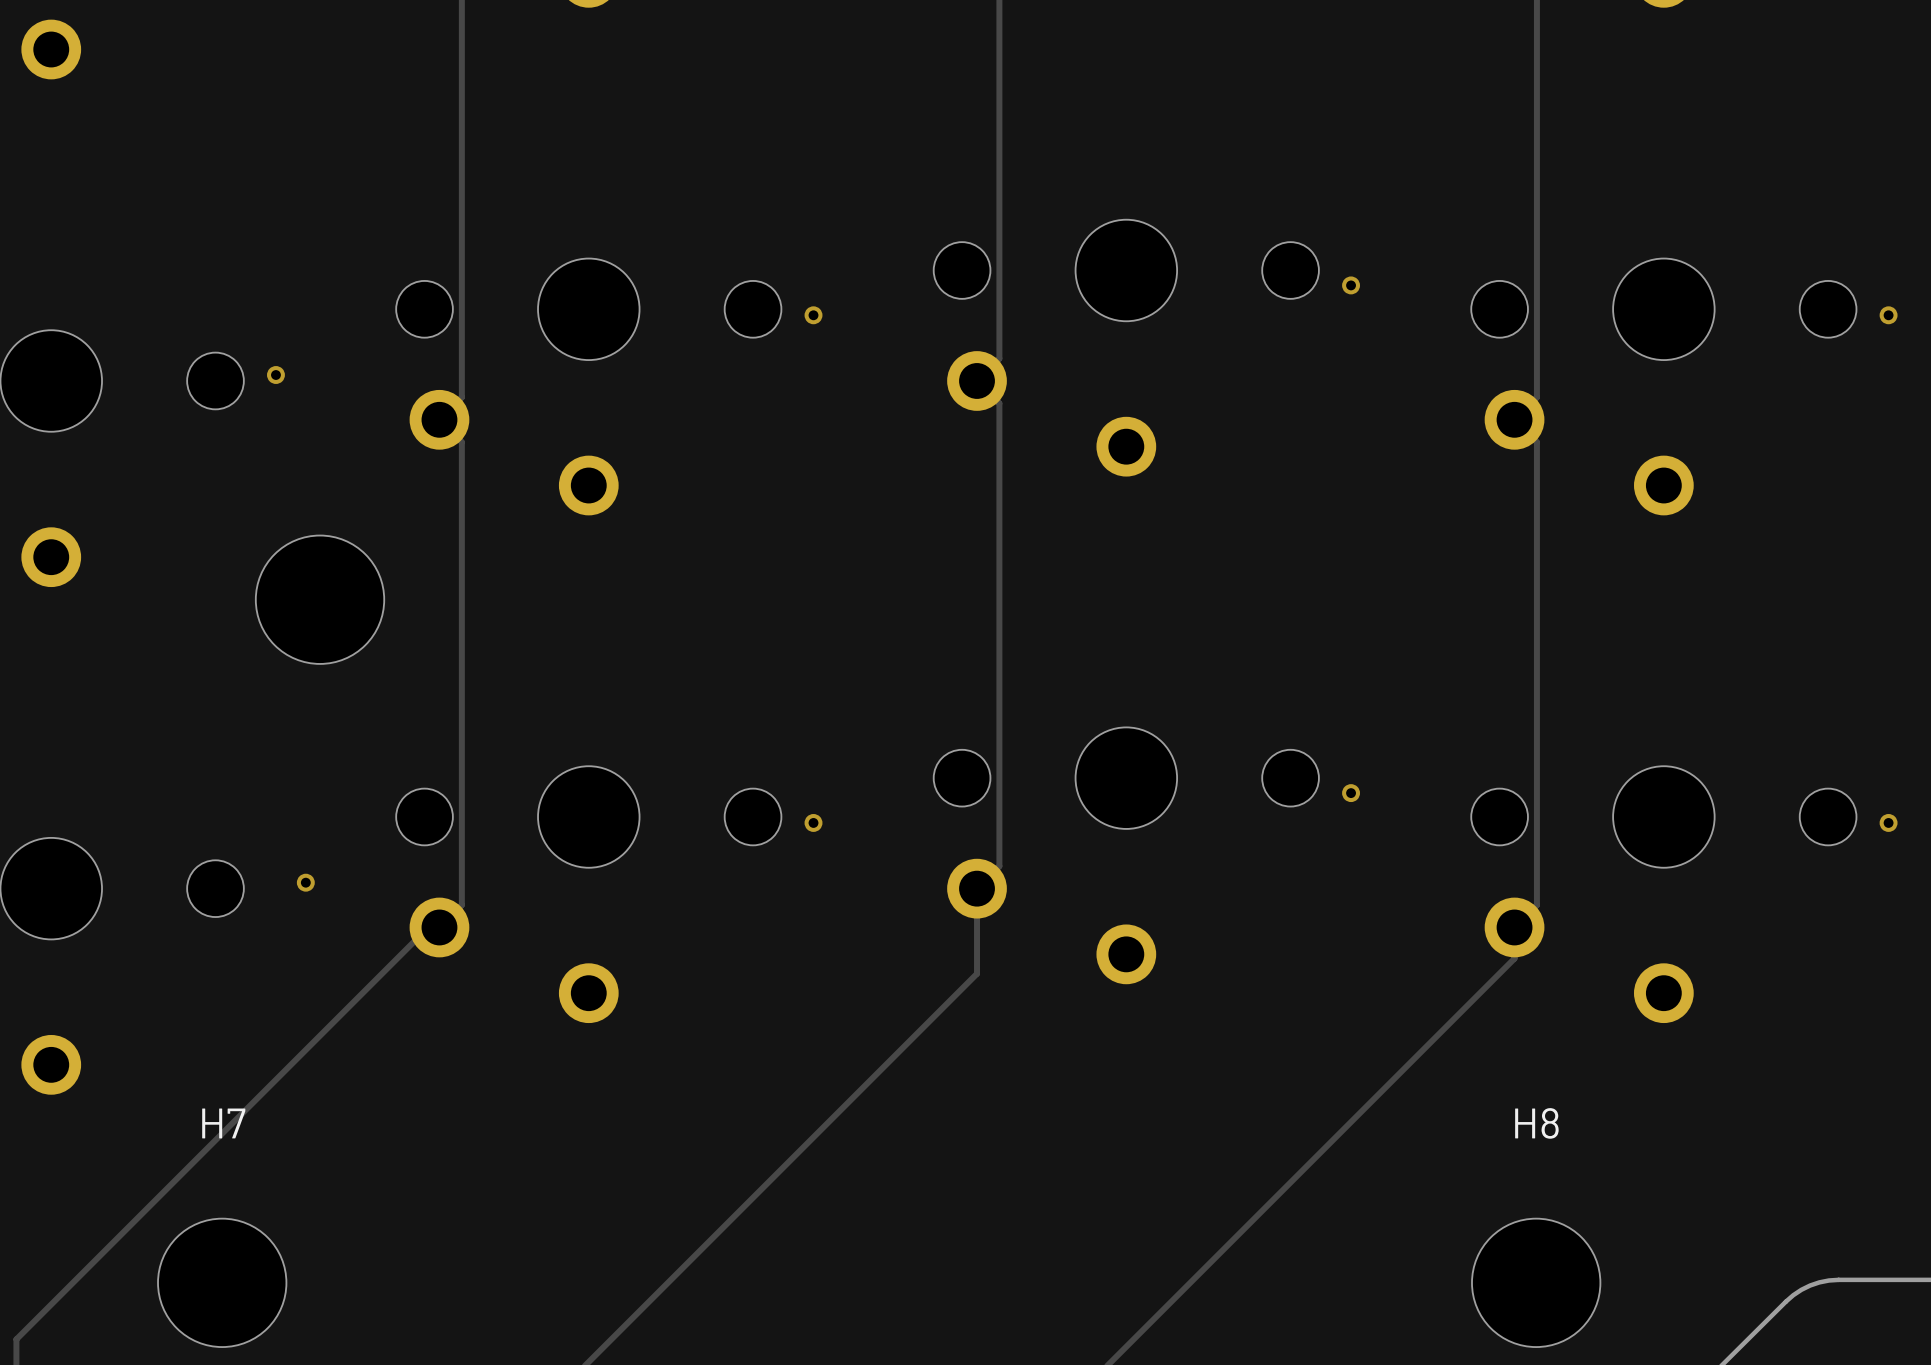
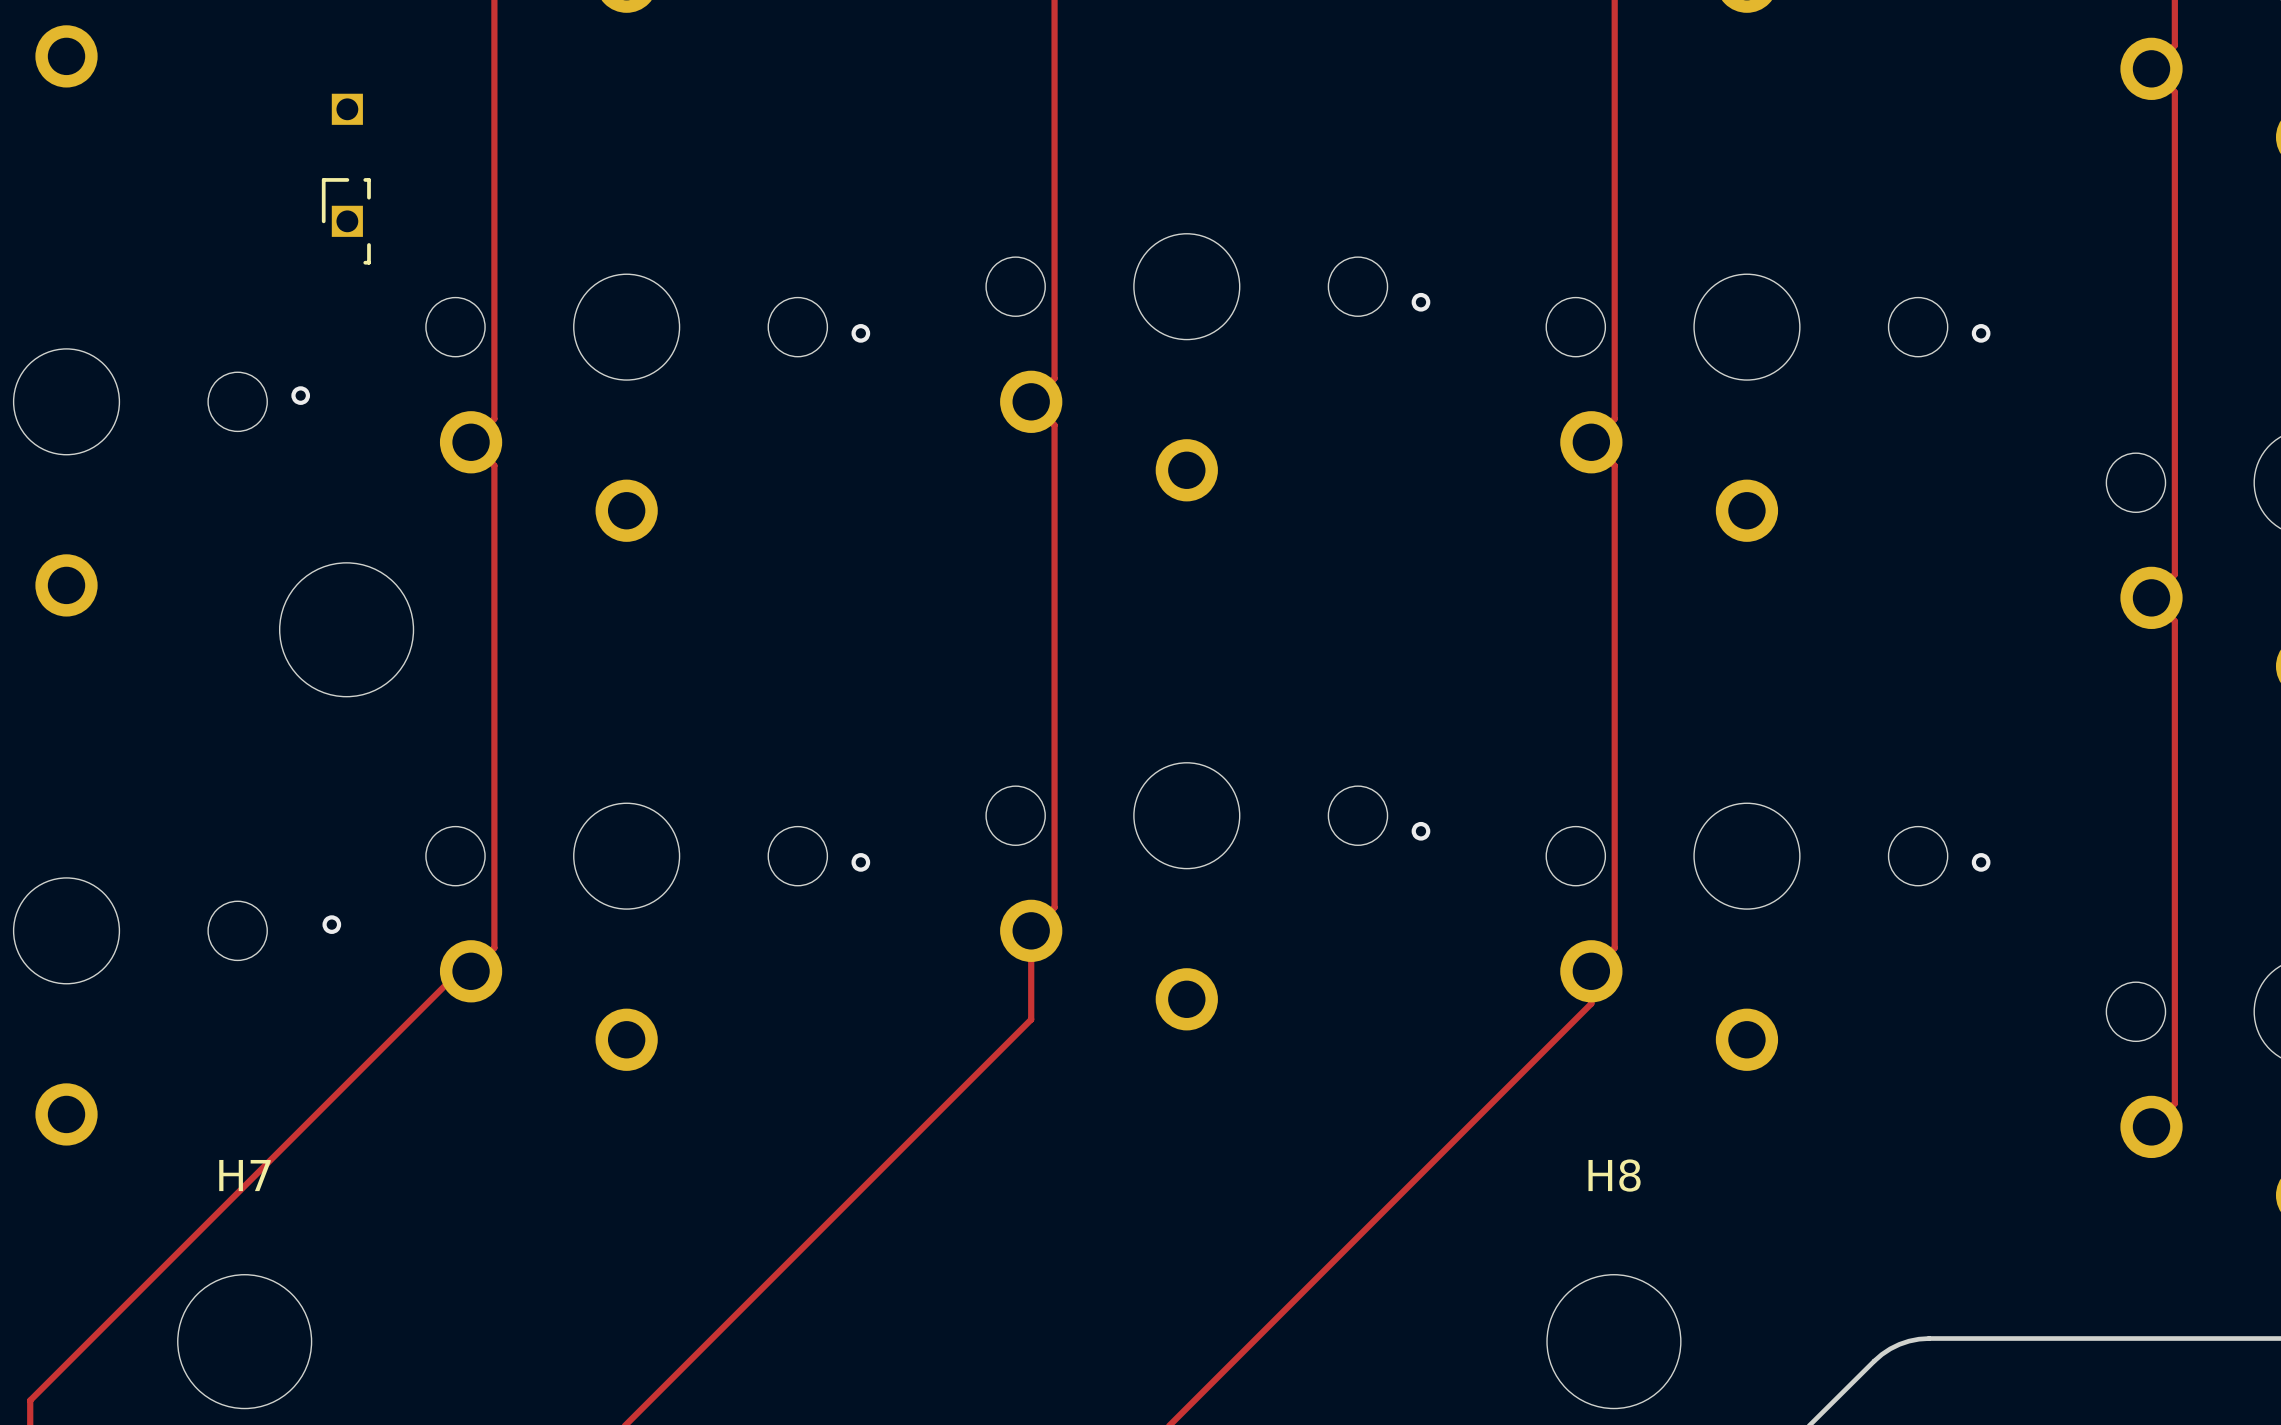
part: none -> (347, 109)
part: none -> (346, 221)

